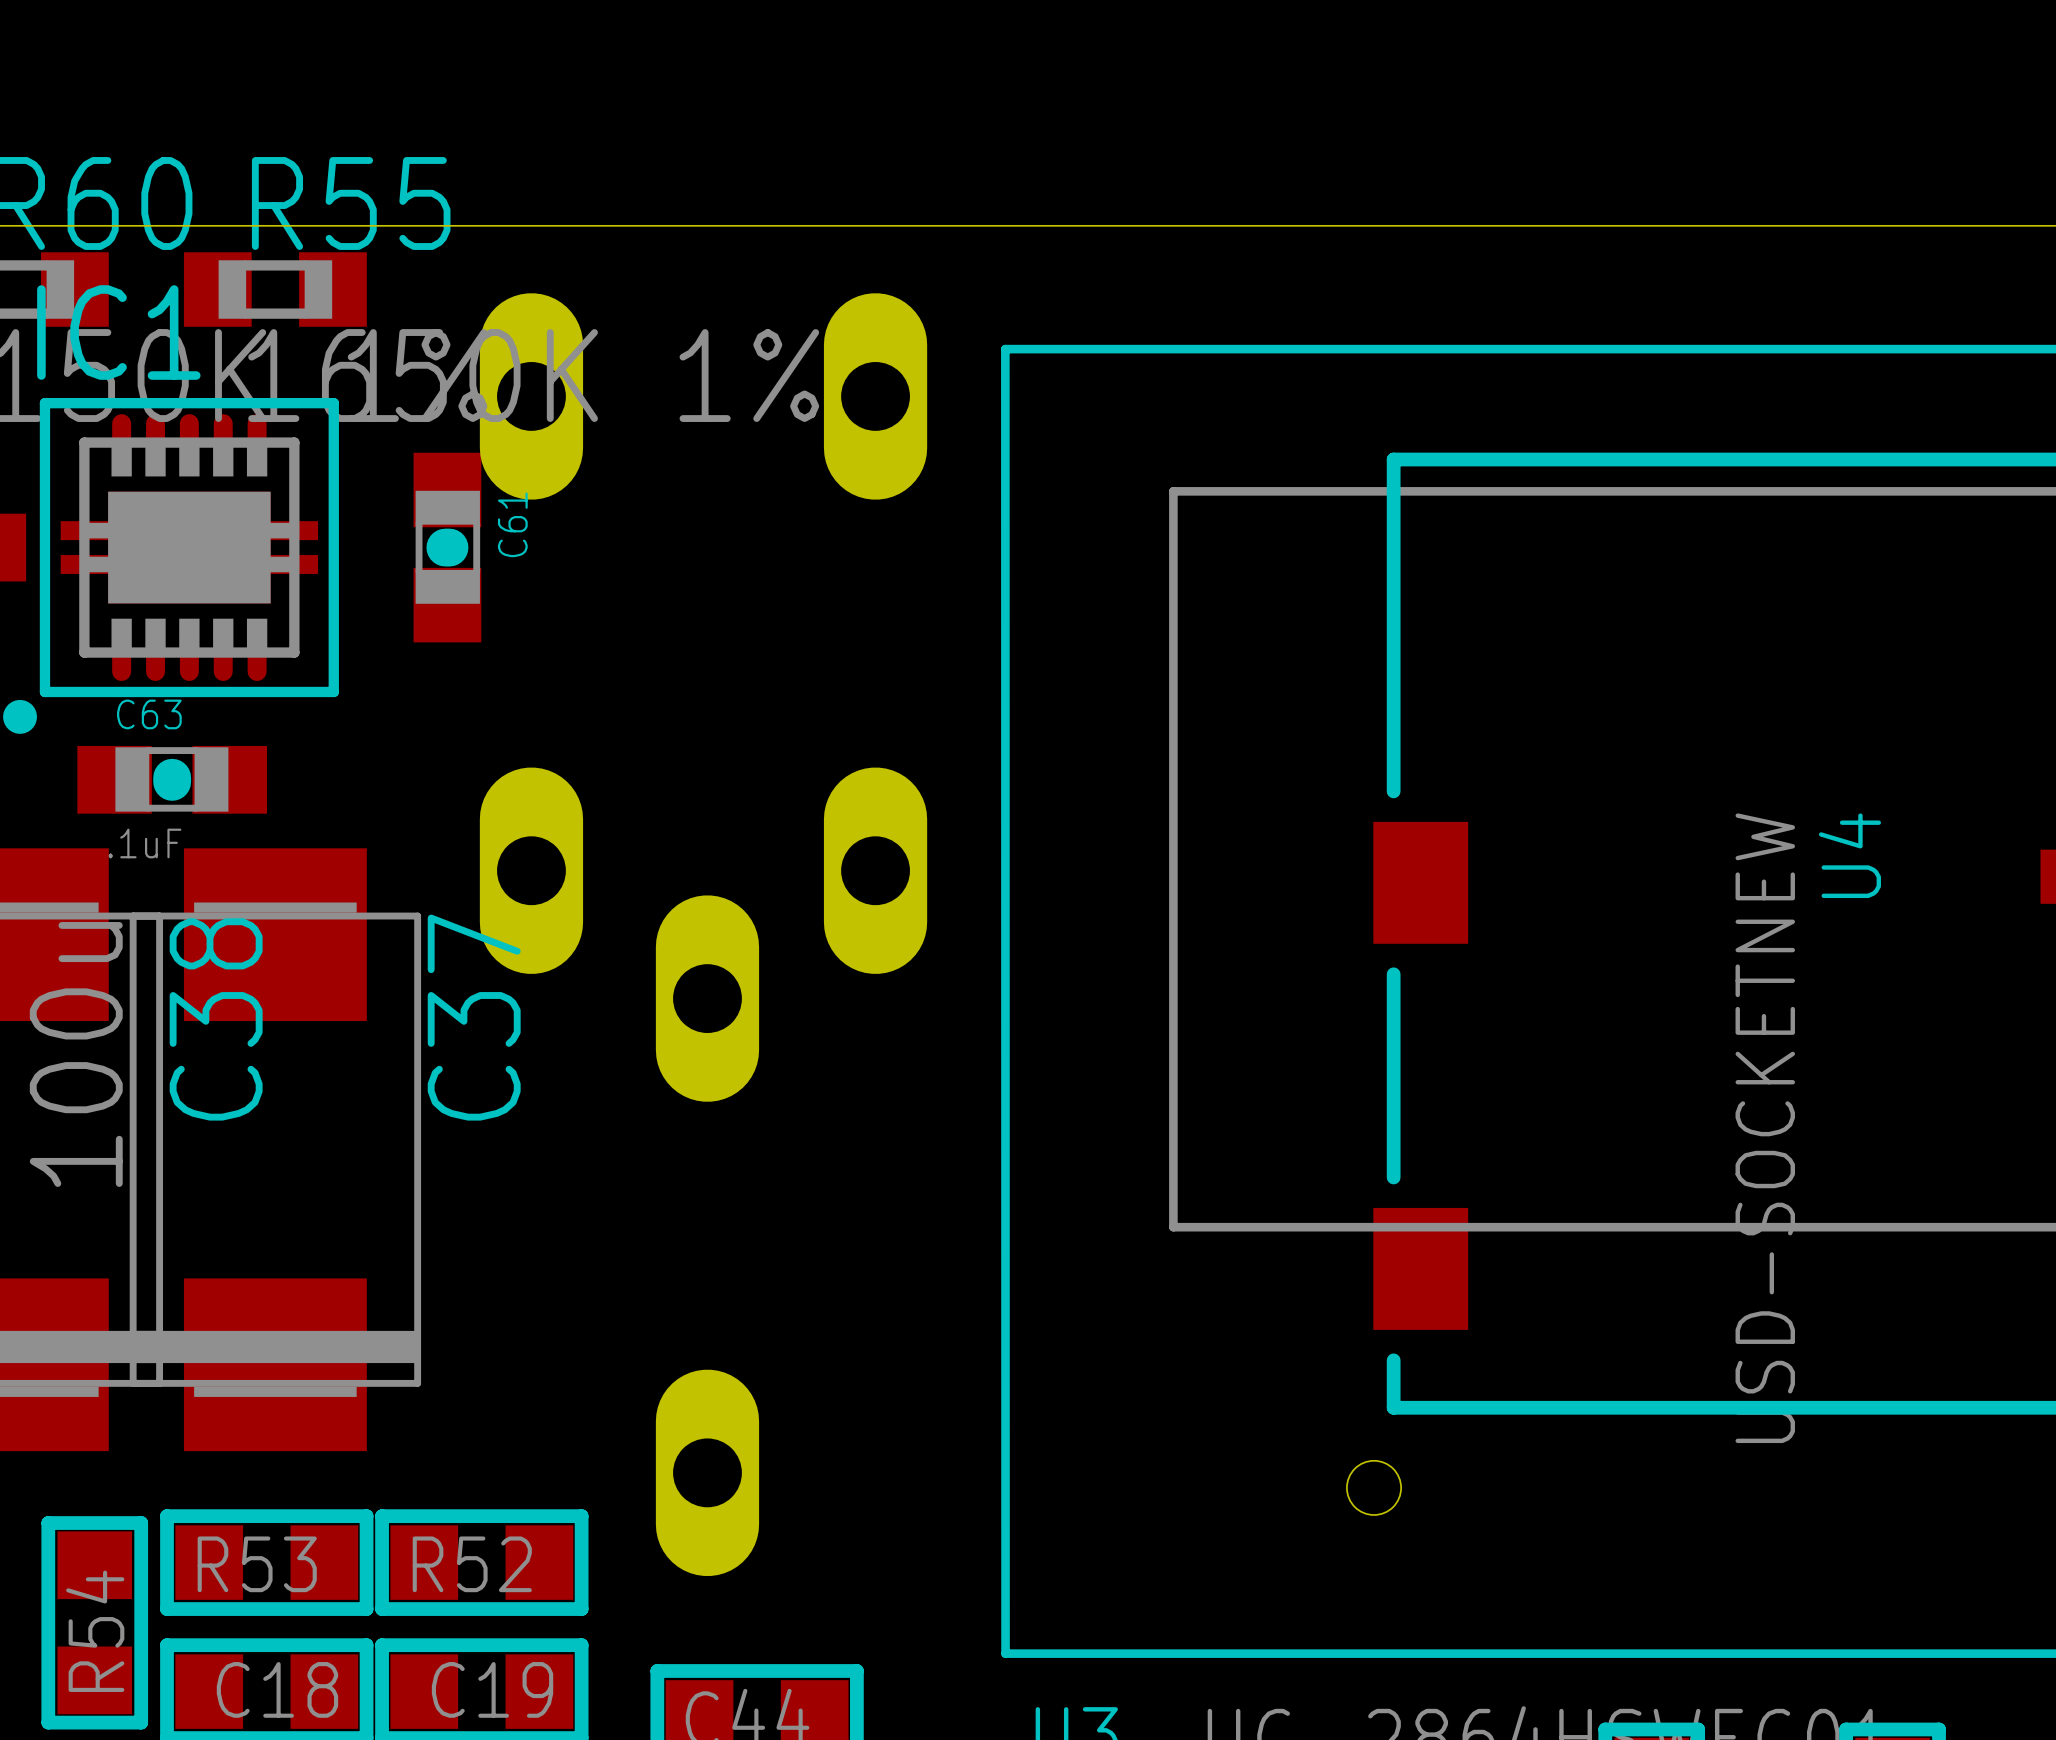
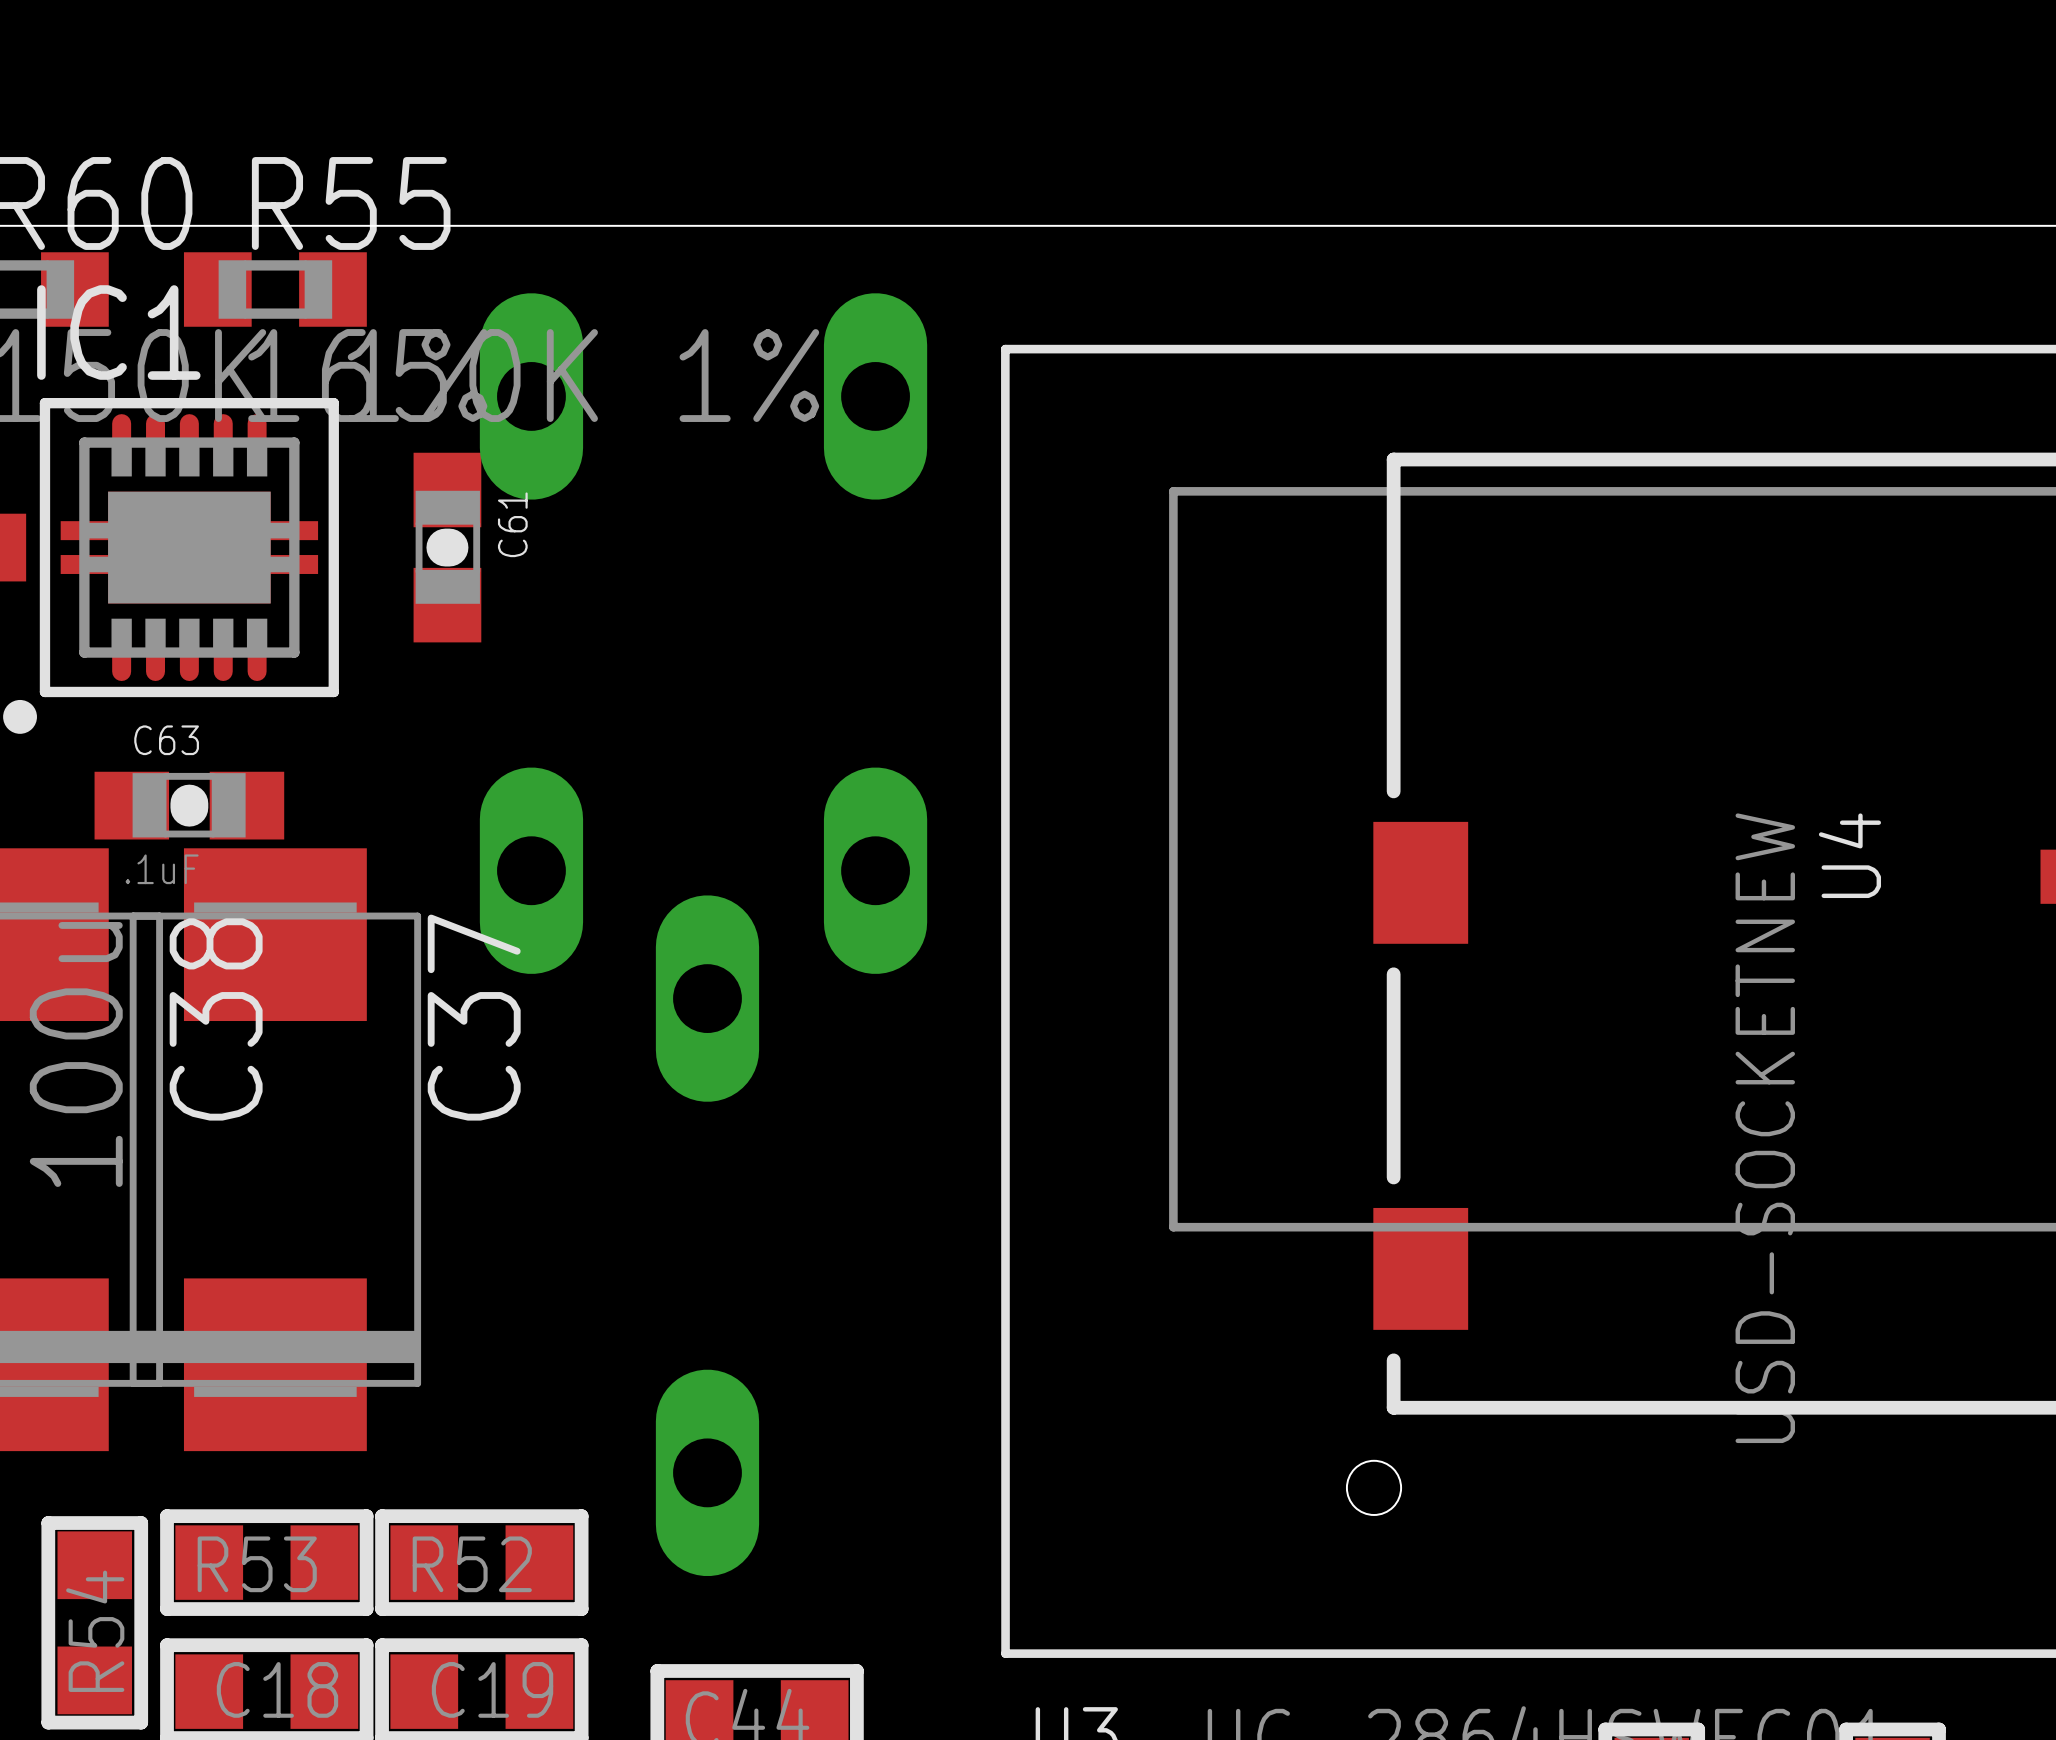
C63 position: (172, 779) -> (189, 805)

